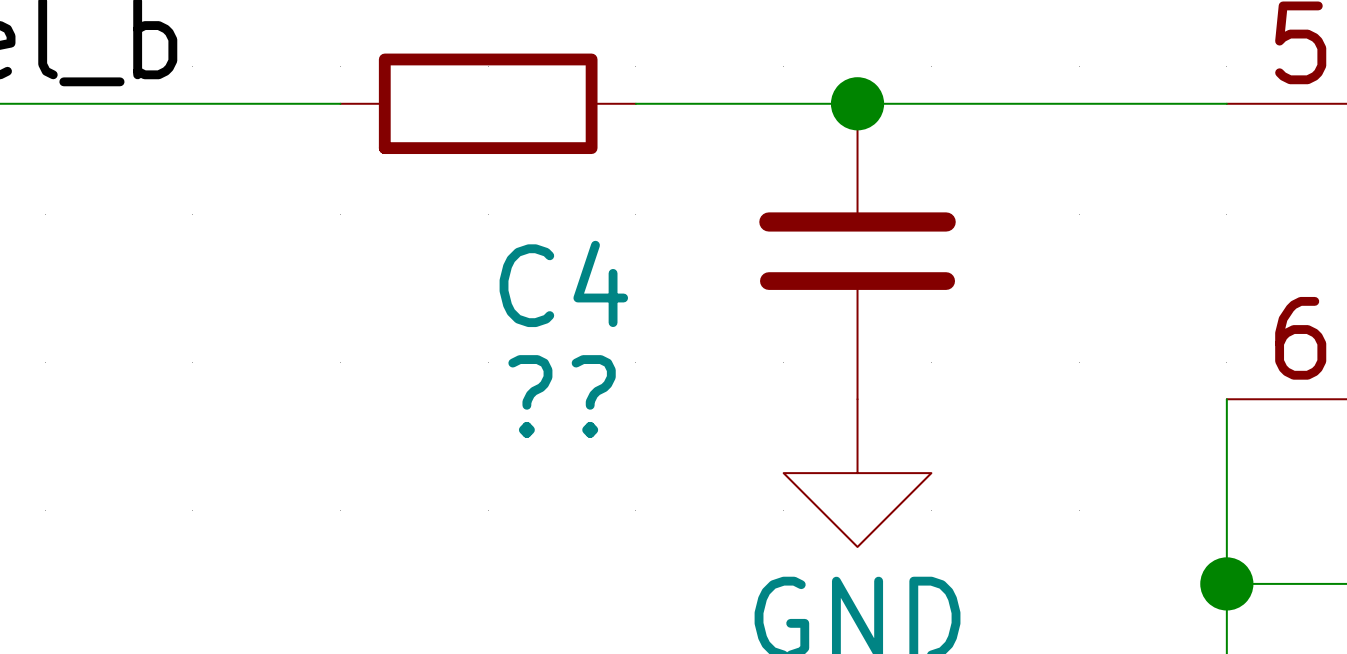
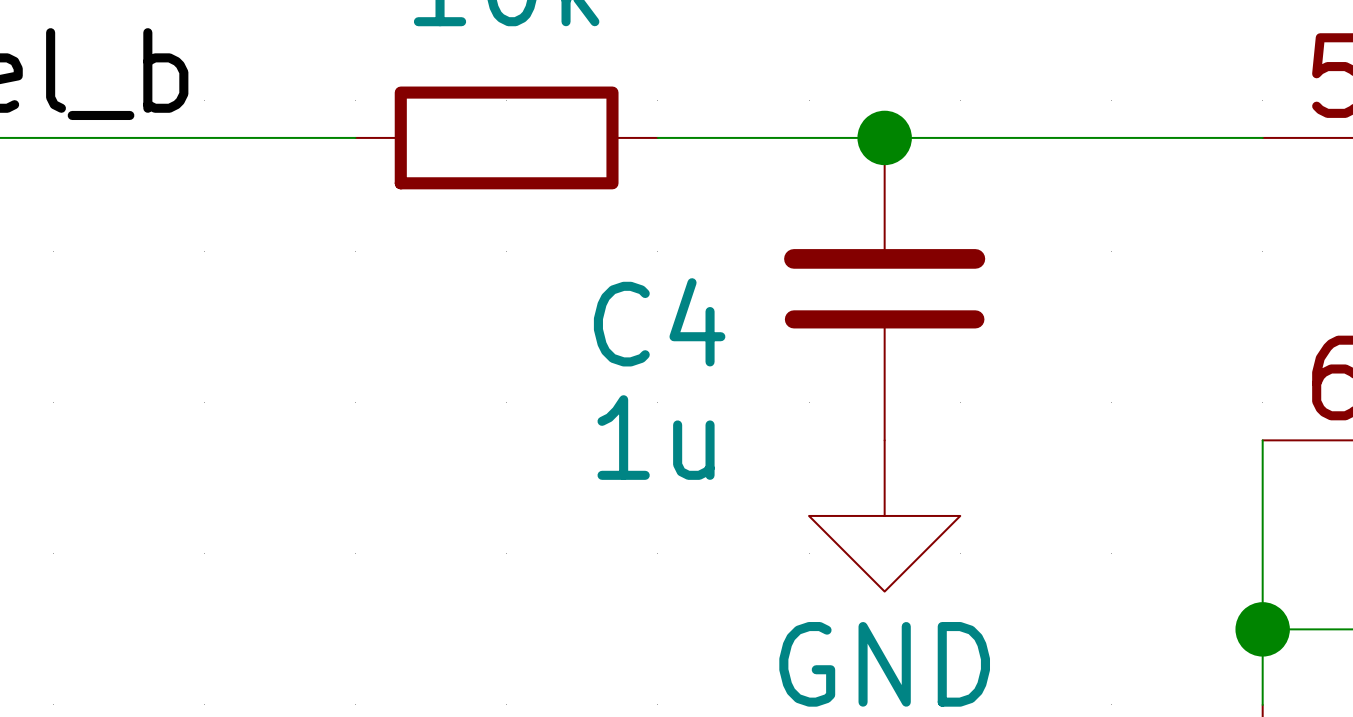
C4 name position: C4 (563, 283) -> C4 (659, 322)
C4 value: ?? (562, 396) -> 1u (656, 437)

